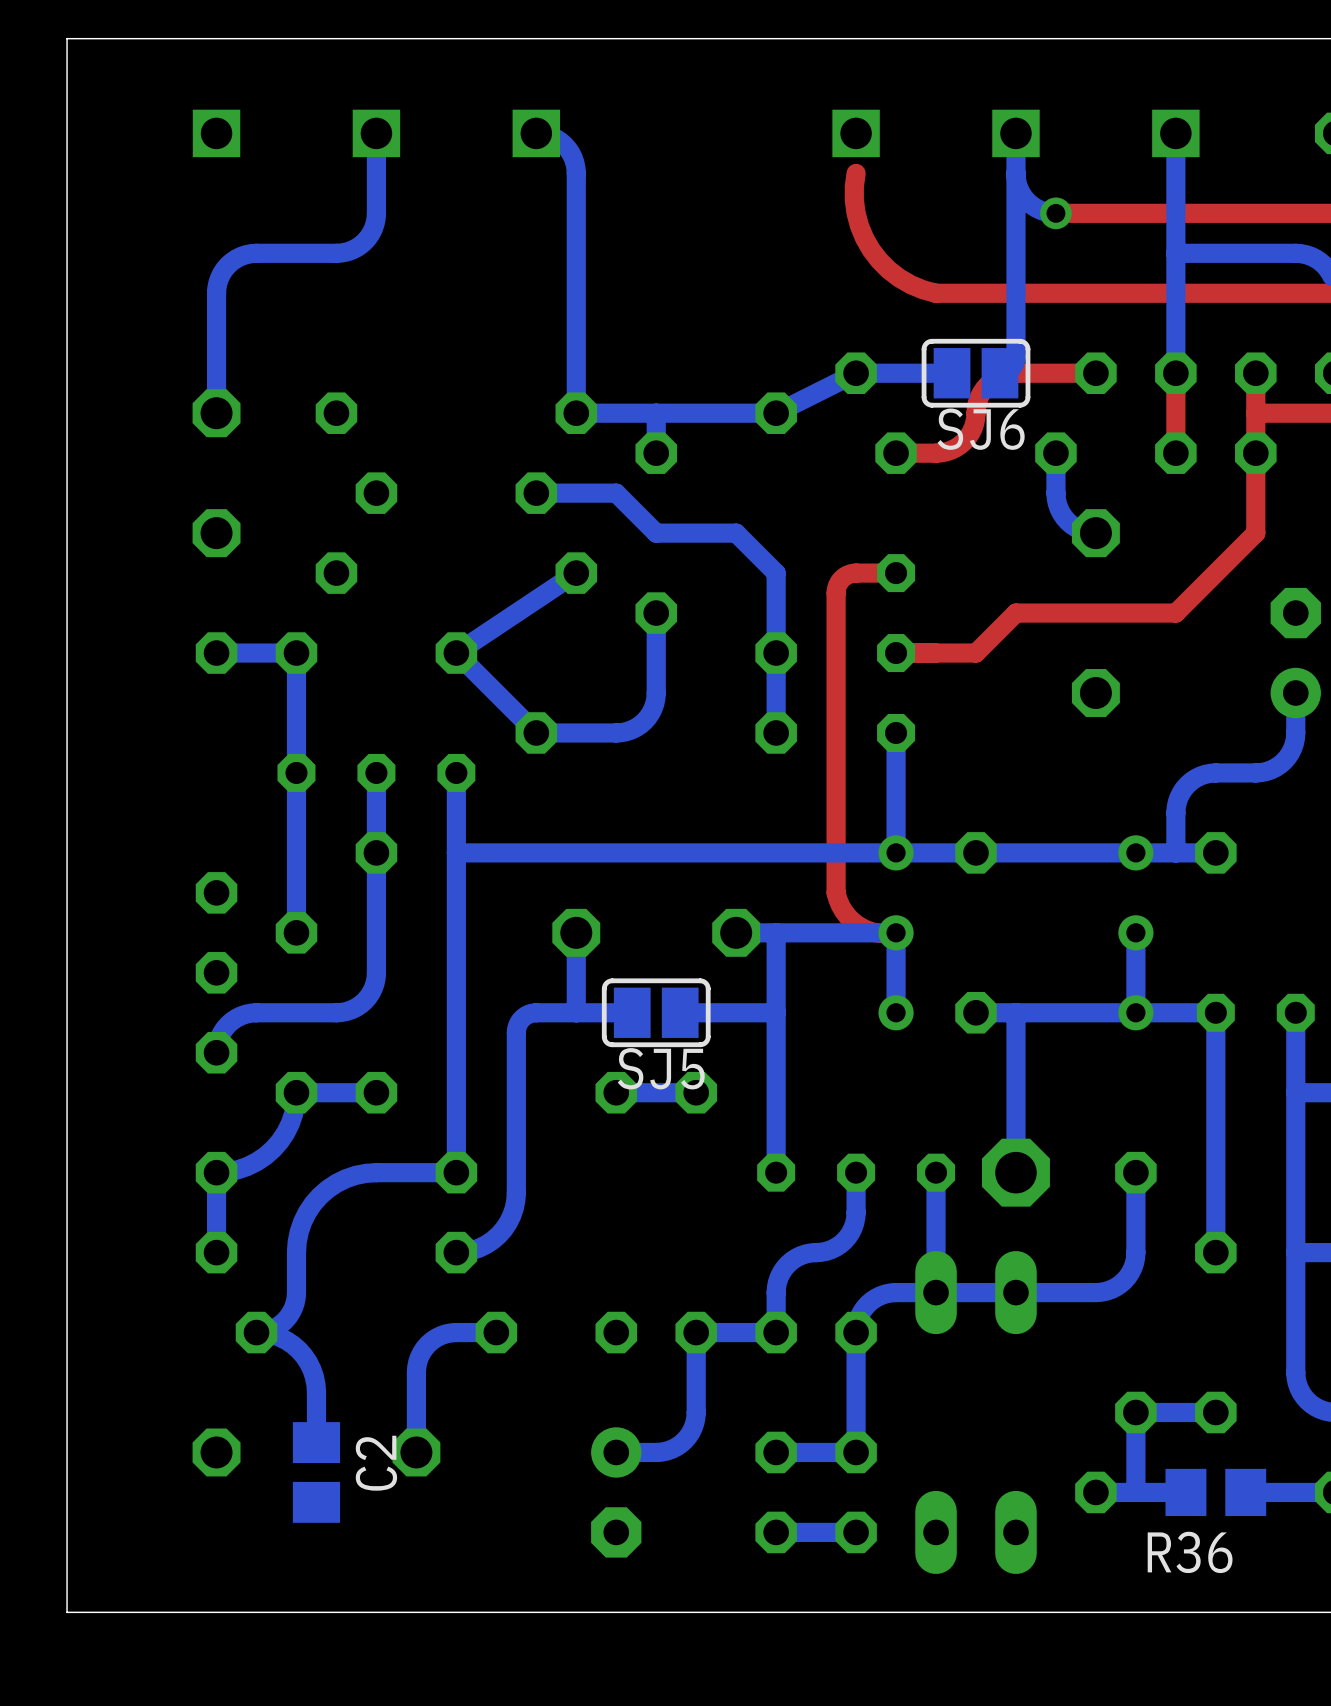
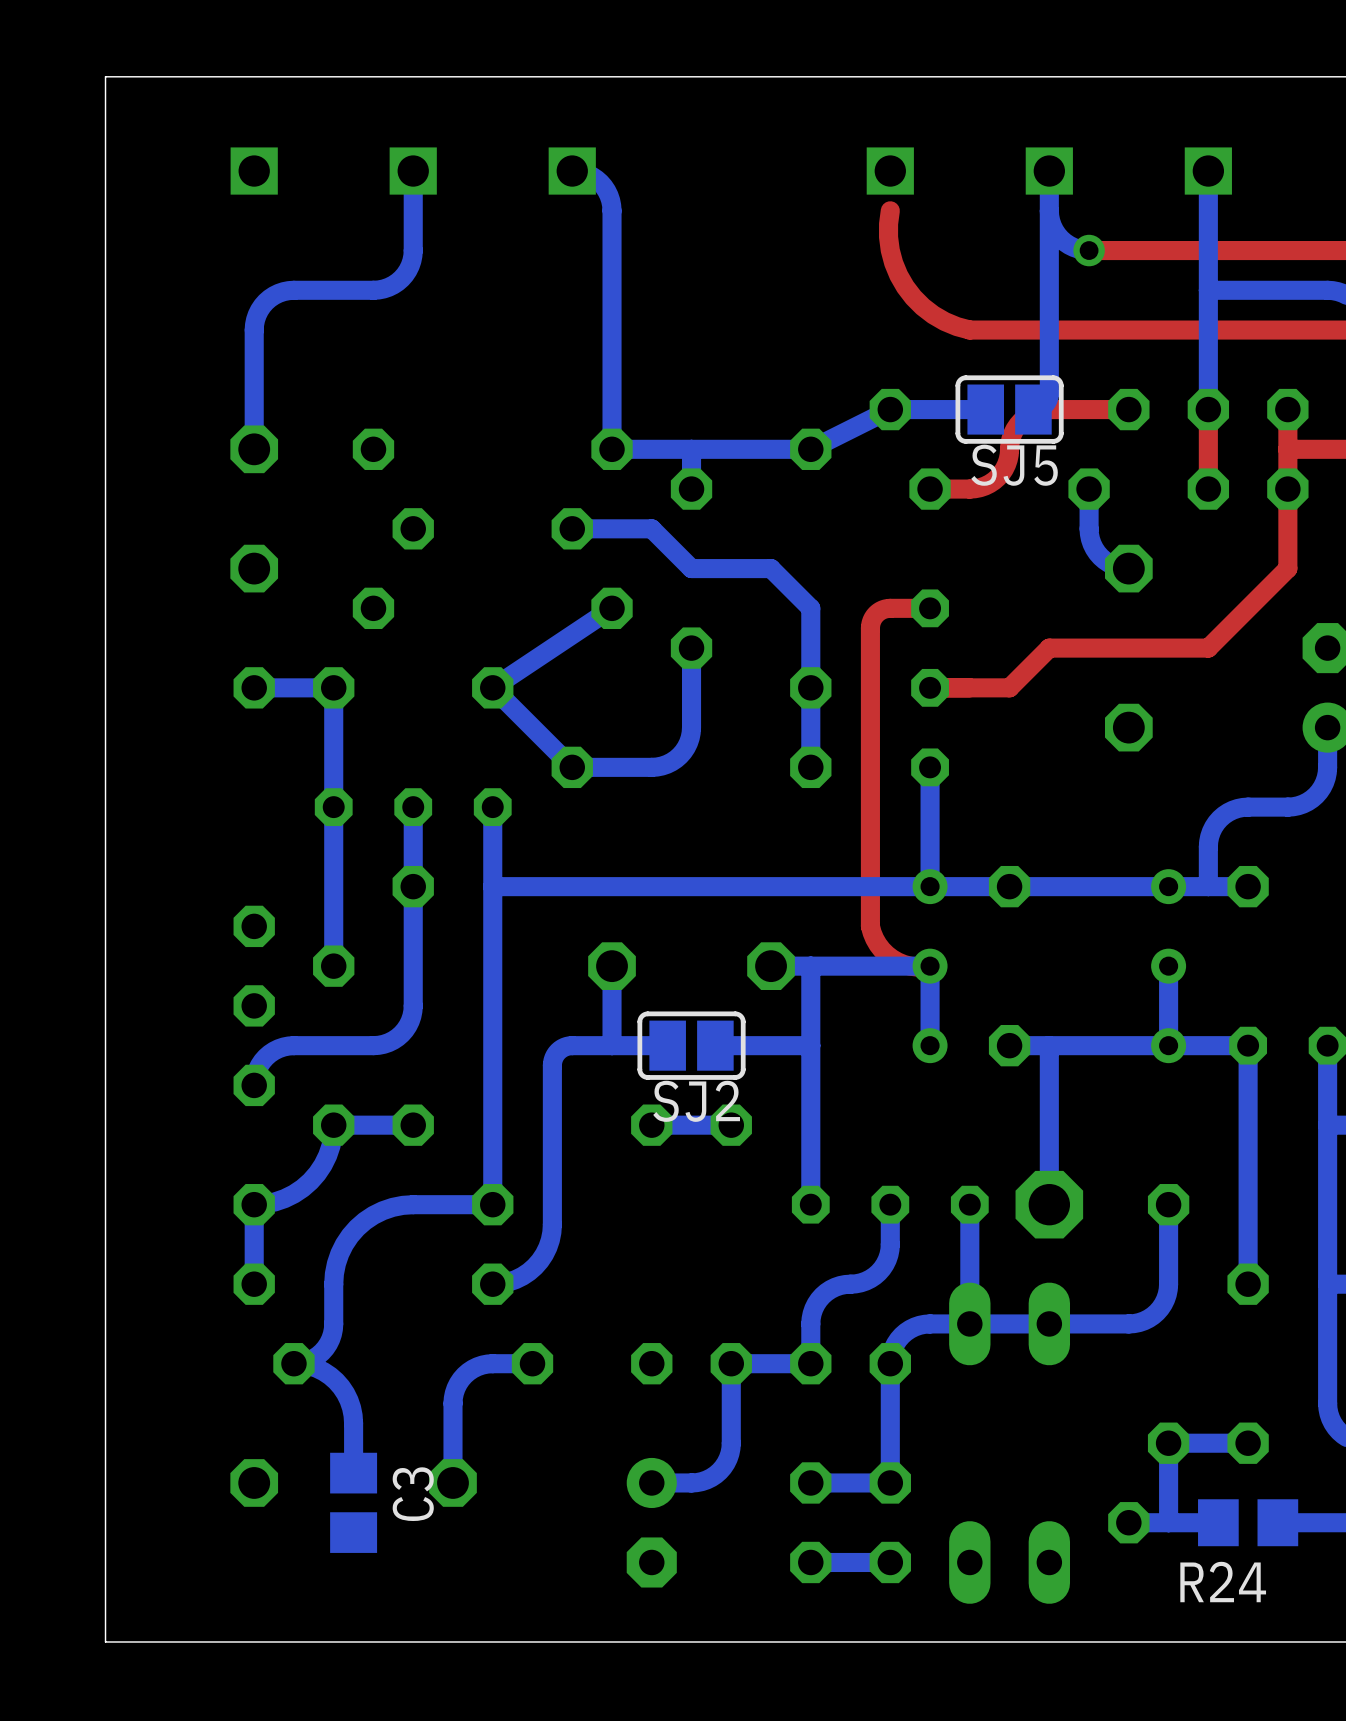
SJ6 name: SJ6 (981, 429) -> SJ5 (1014, 465)
SJ5 name: SJ5 (661, 1068) -> SJ2 (696, 1101)
C2 name: C2 (376, 1463) -> C3 (413, 1494)
R36 name: R36 (1190, 1552) -> R24 (1223, 1582)

